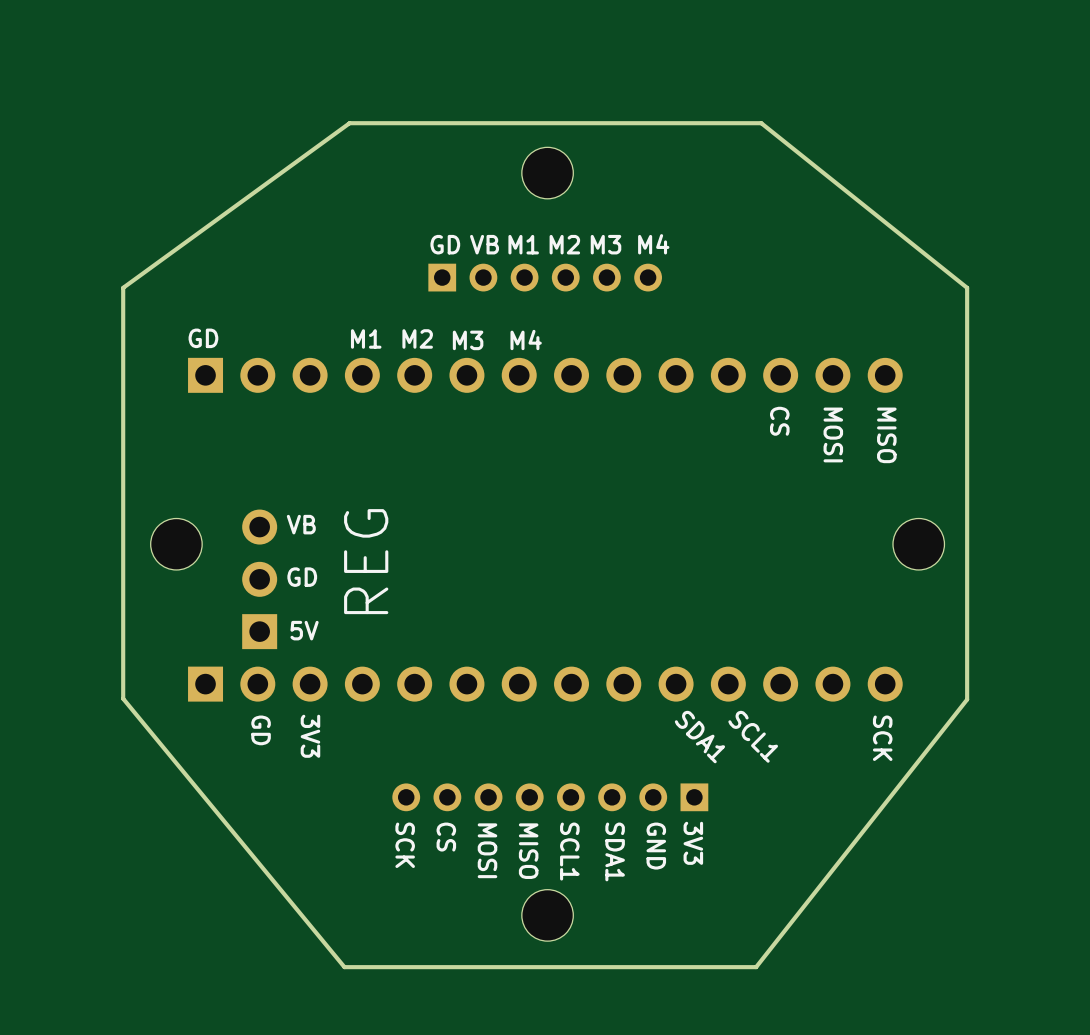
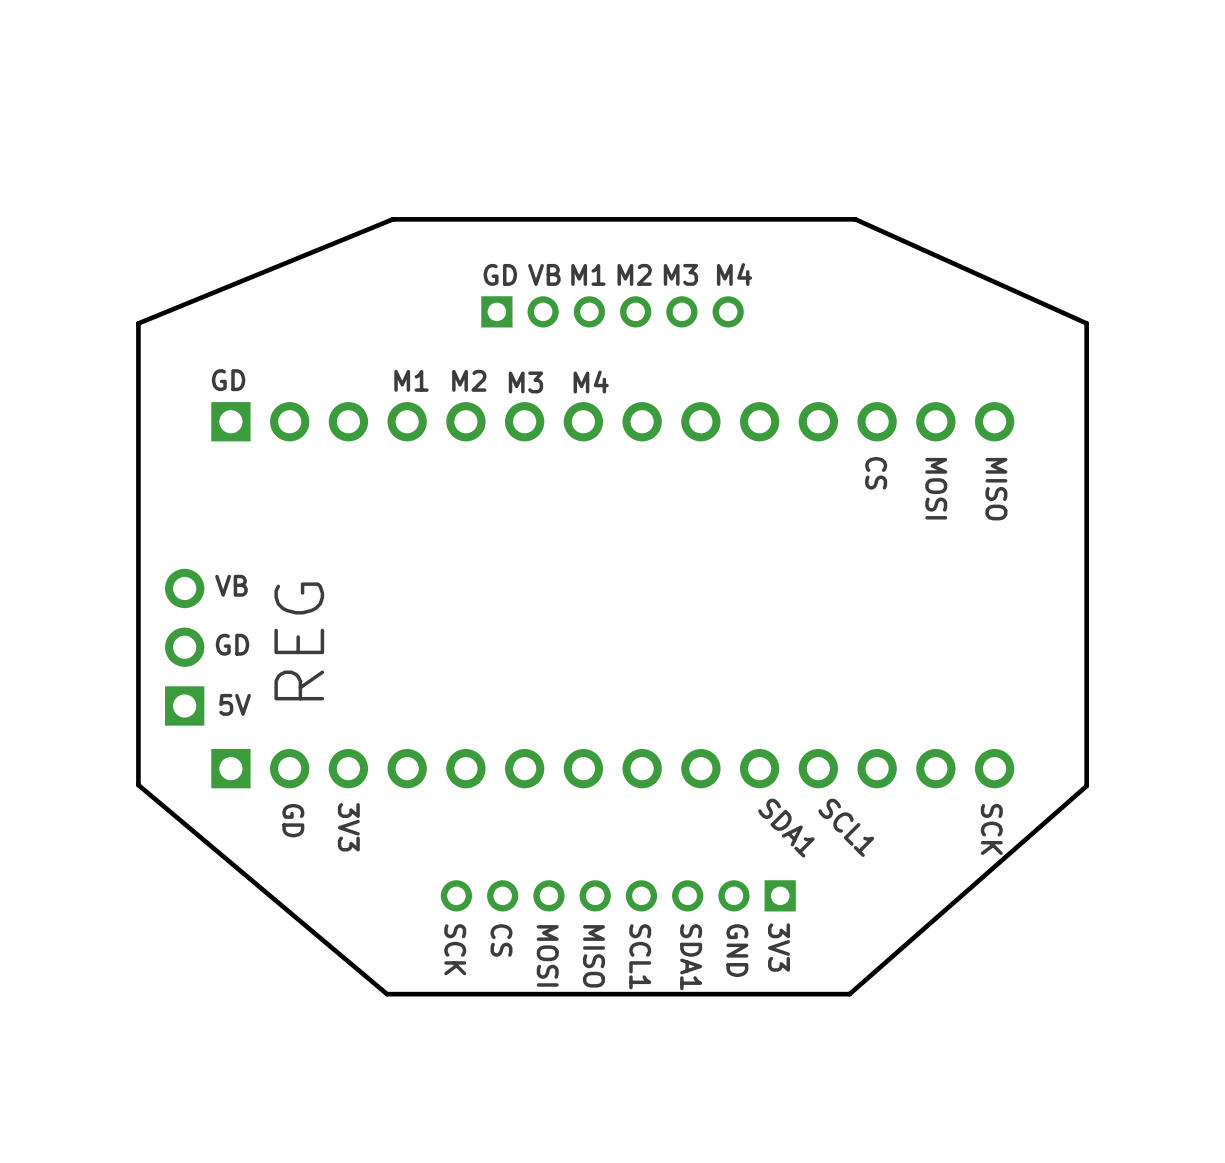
part: (547, 173) -> none
board edge: (967, 287) (761, 123) (349, 123) (123, 287) -> (1086, 323) (855, 219) (392, 219) (138, 323)
text position: VB (301, 524) -> VB (231, 585)
part: (176, 544) -> none
part: (918, 544) -> none
text: REG (366, 561) -> none
text position: GD (302, 577) -> GD (232, 644)
part position: (259, 579) -> (184, 647)
text: none -> 5V (235, 704)
text: 5V (304, 630) -> REG (299, 641)
board edge: (123, 698) (344, 967) (756, 967) (967, 699) -> (138, 785) (387, 994) (849, 994) (1086, 785)
part: (547, 915) -> none

